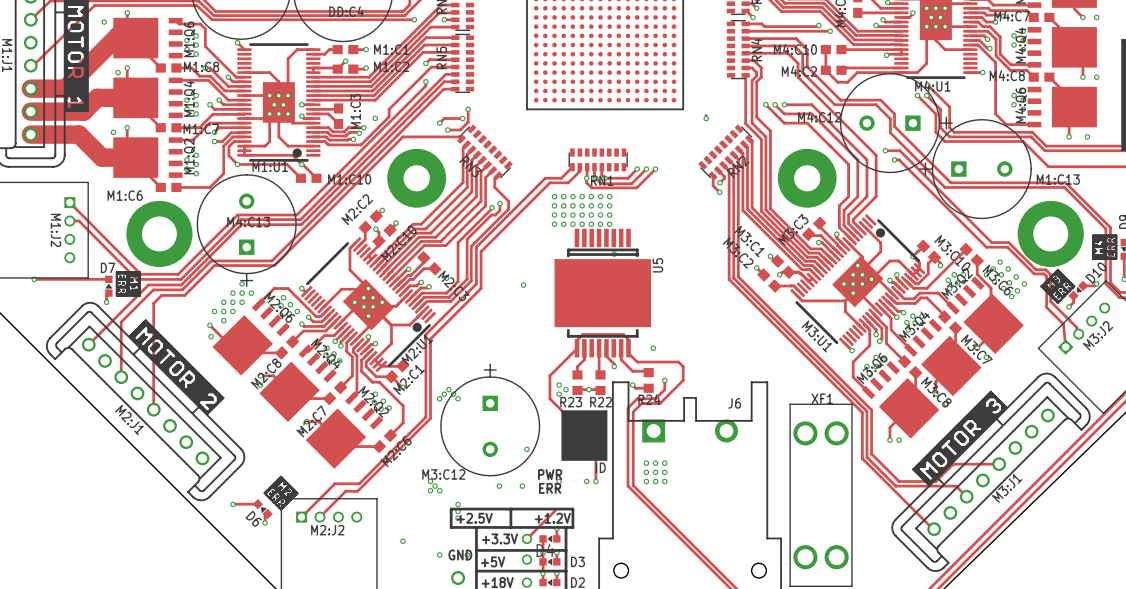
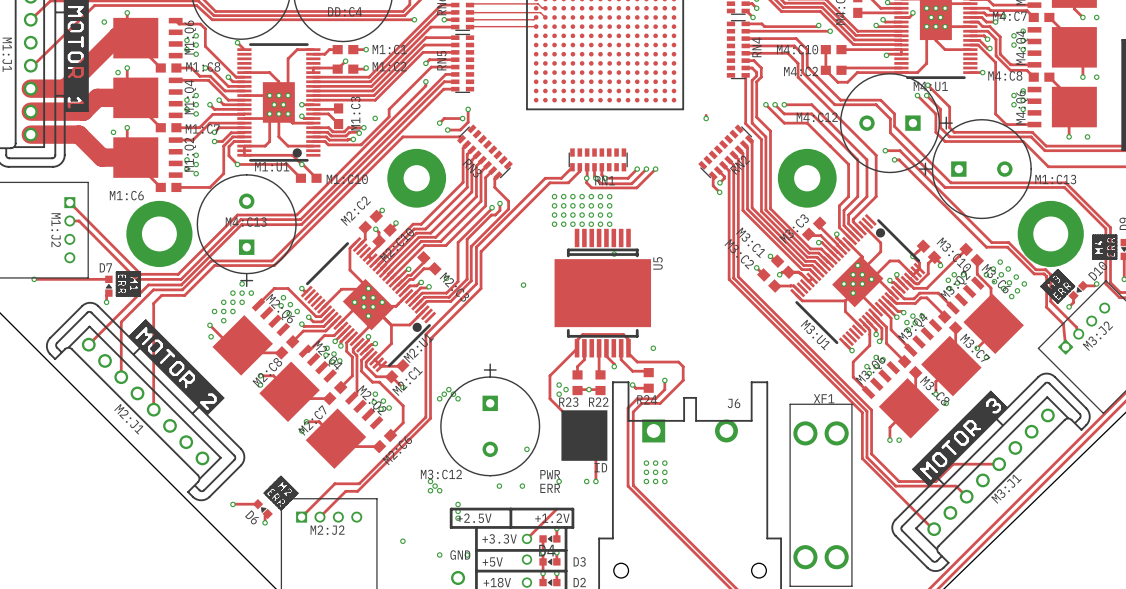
track: none -> (470, 5) (537, 3) (542, 8) (545, 8)
track: none -> (470, 12) (540, 12) (545, 17)
track: none -> (536, 17) (533, 19) (470, 19)
track: none -> (536, 26) (470, 27)

